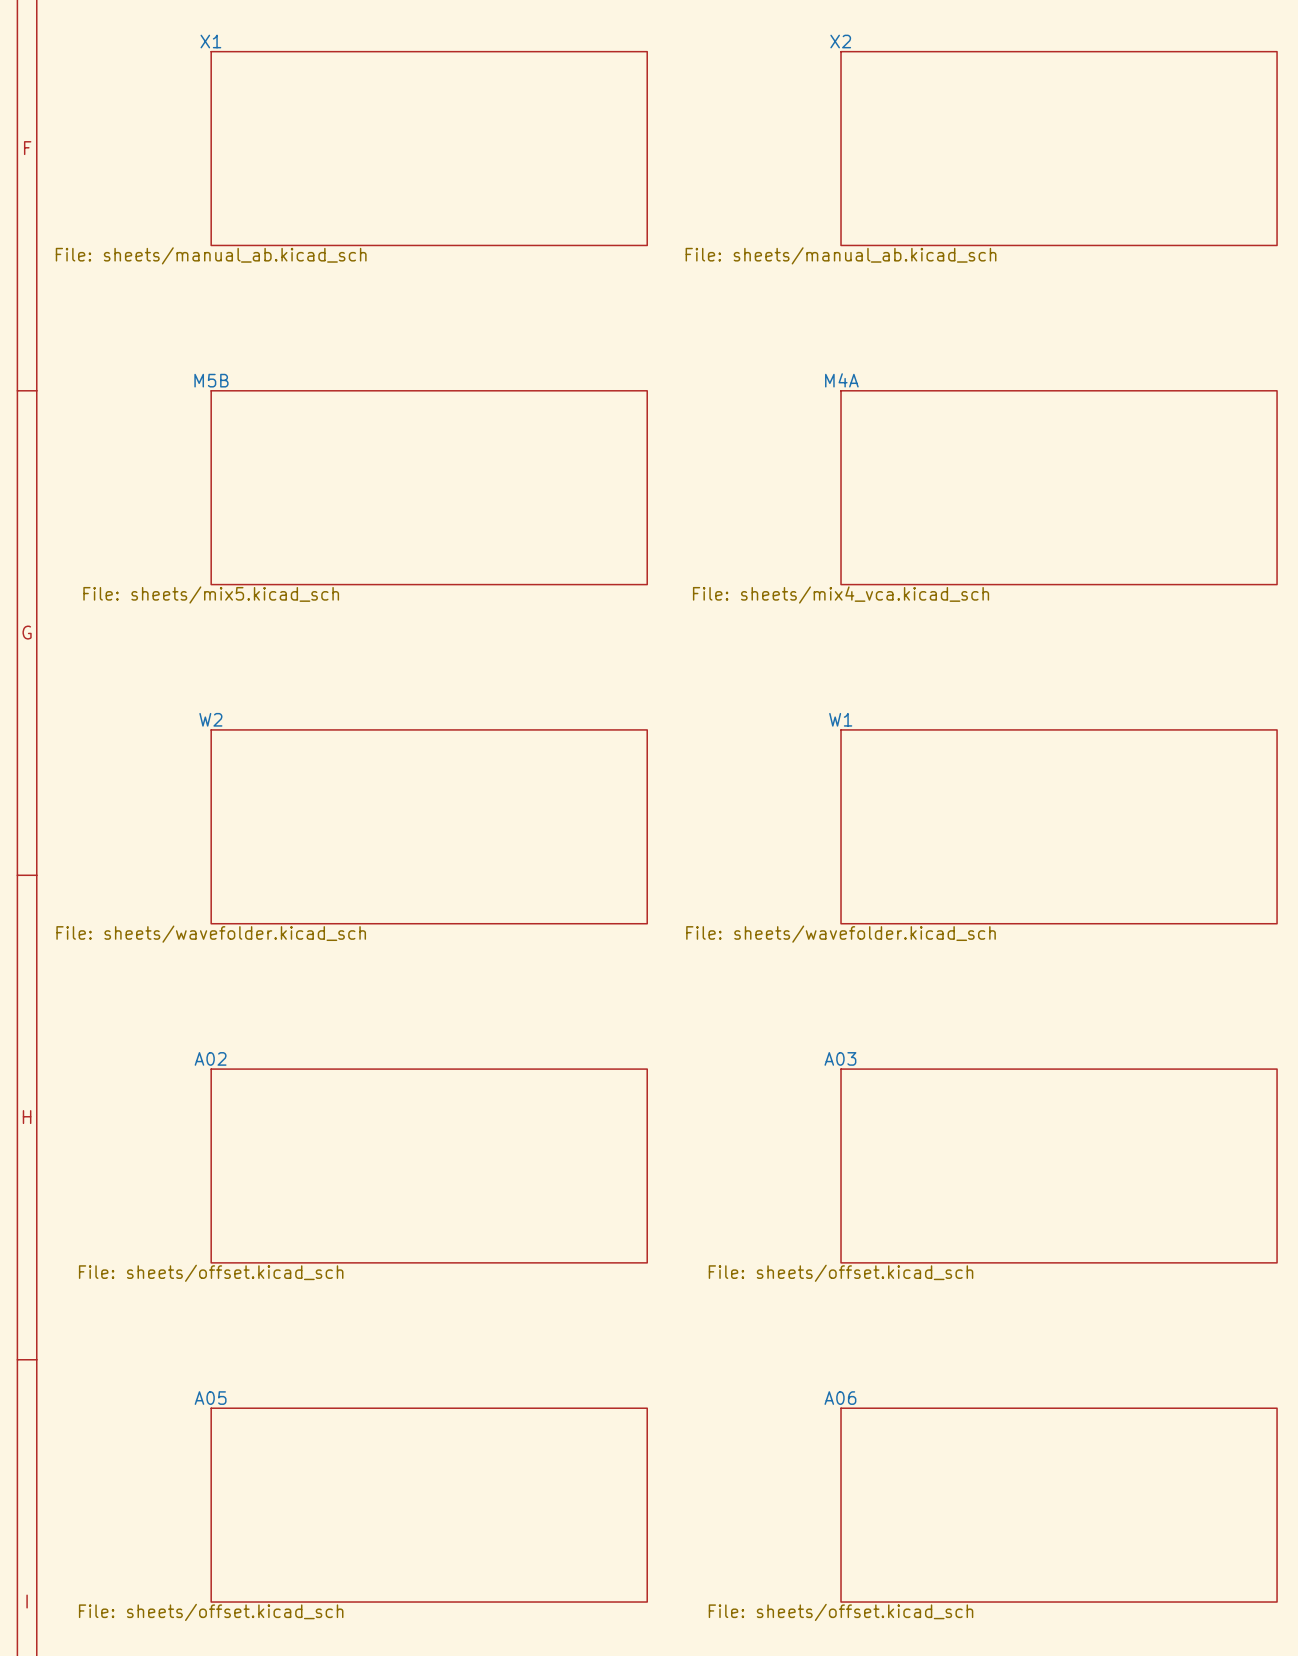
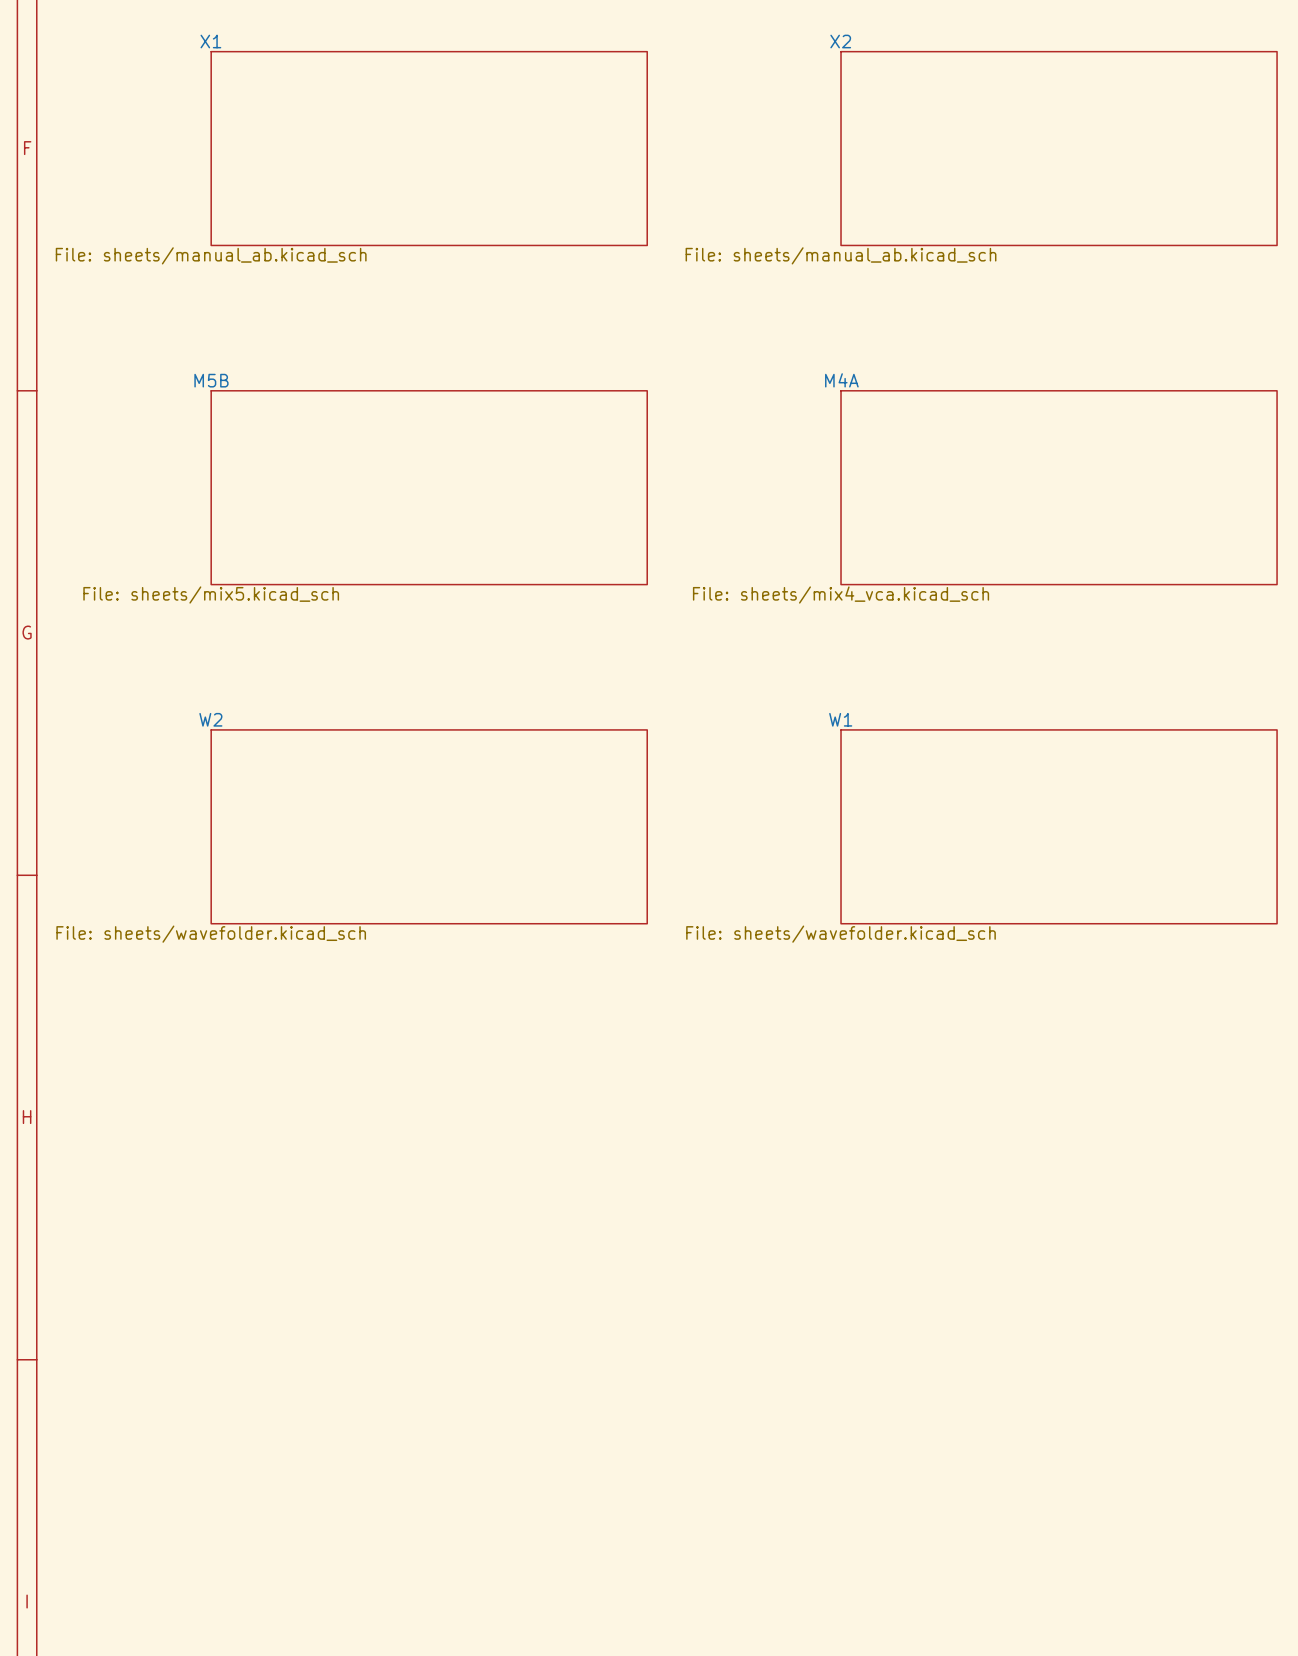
sheet A02: File: sheets/offset.kicad_sch (429, 1165) -> none
sheet A03: File: sheets/offset.kicad_sch (1059, 1165) -> none
sheet A05: File: sheets/offset.kicad_sch (429, 1505) -> none
sheet A06: File: sheets/offset.kicad_sch (1059, 1505) -> none

